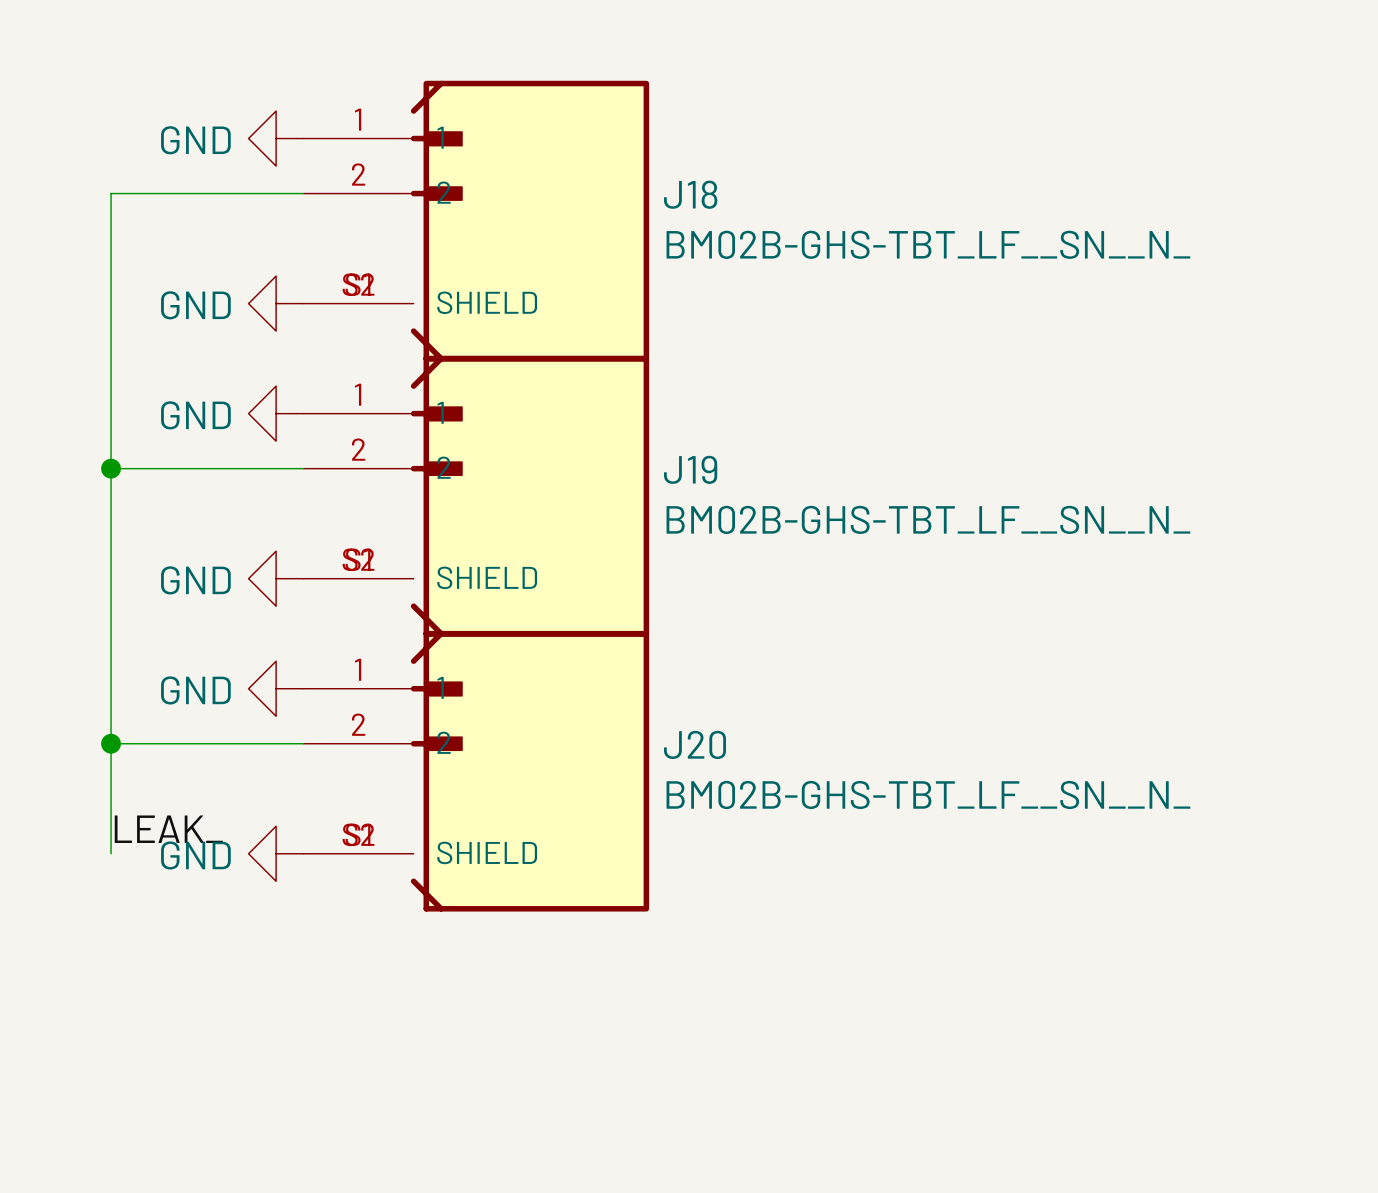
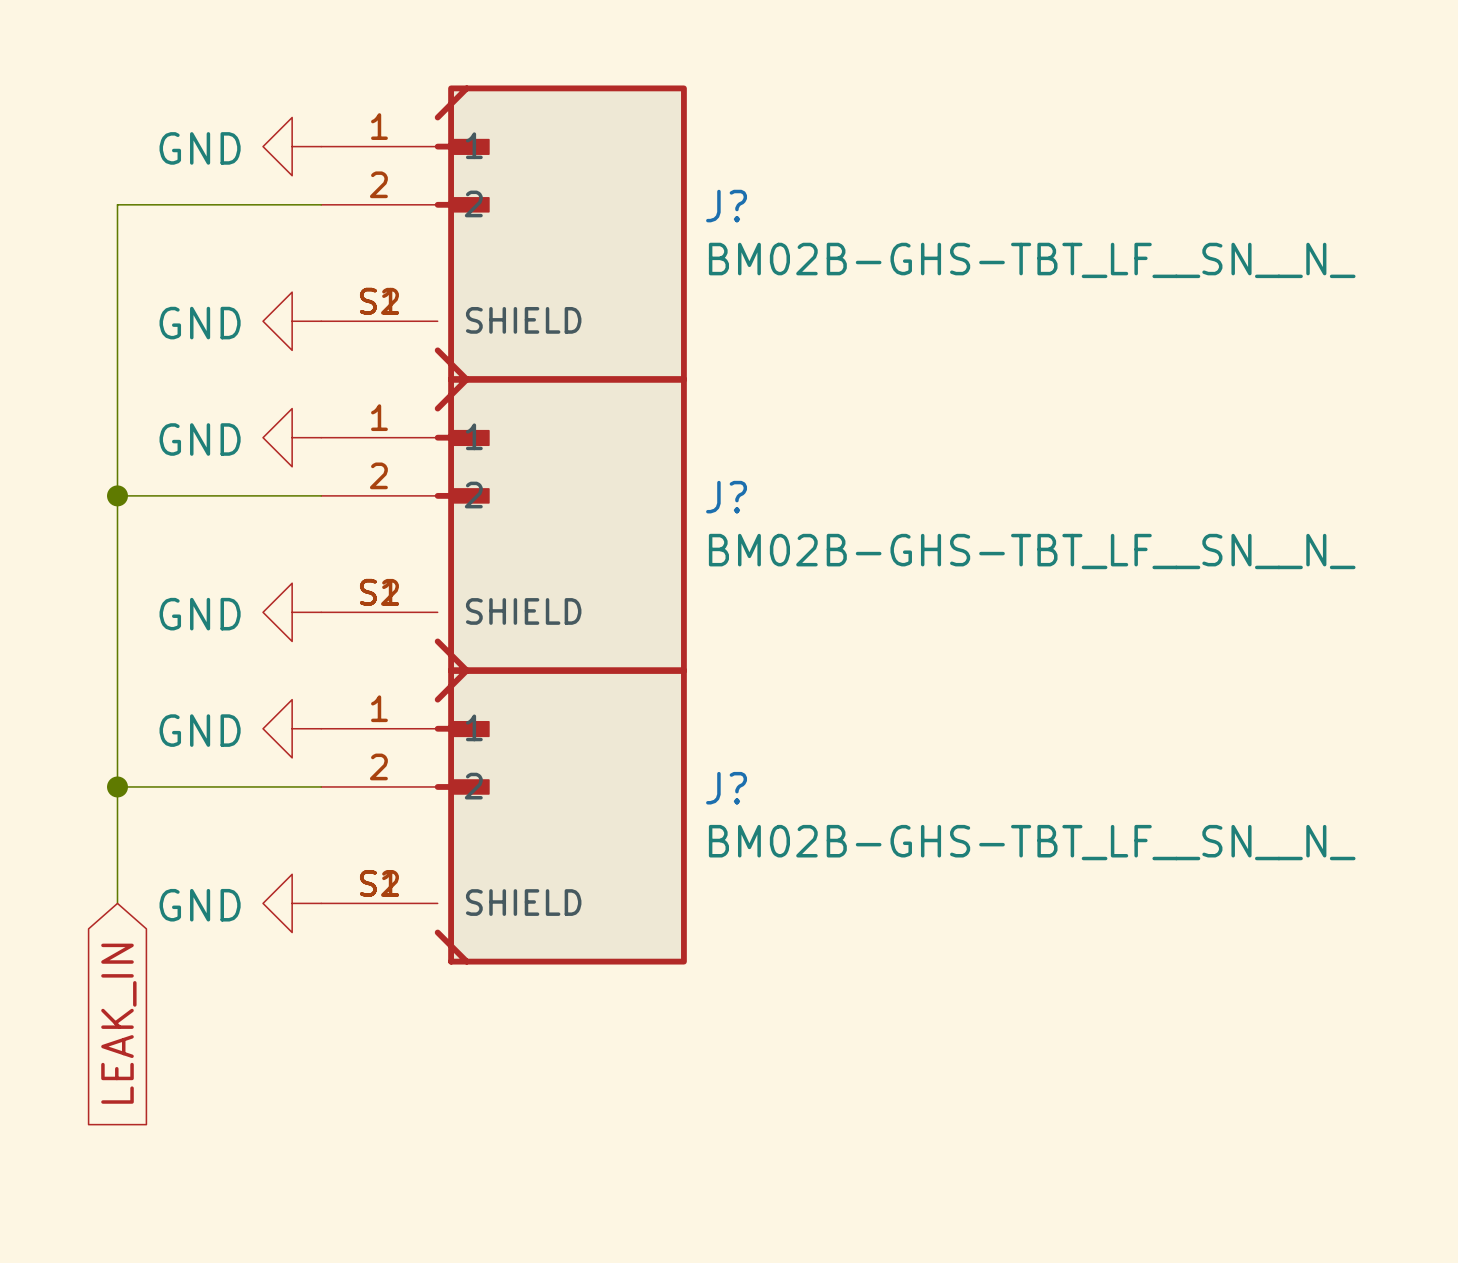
J18 name: J18 (690, 194) -> J? (726, 206)
J19 name: J19 (690, 469) -> J? (726, 497)
J20 name: J20 (695, 744) -> J? (726, 788)
label: LEAK_ (168, 829) -> none
global label: none -> LEAK_IN (118, 1023)

